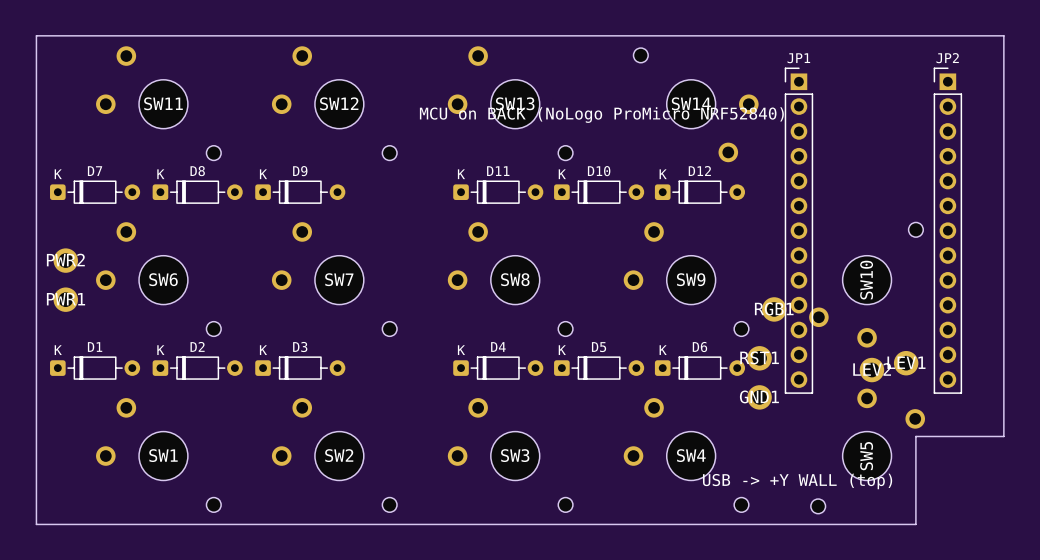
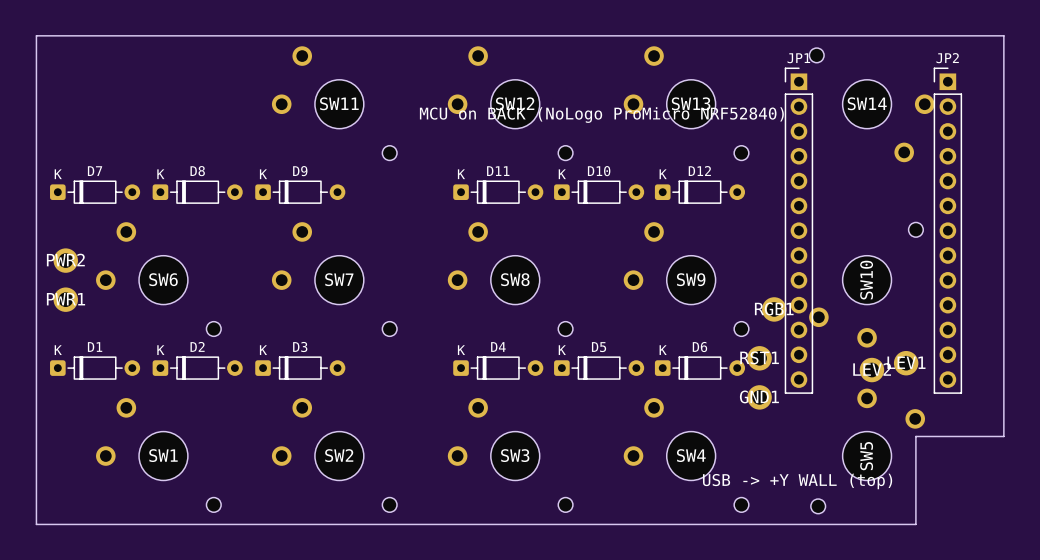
SW11: (158, 103) -> none
SW12 name: SW12 (339, 103) -> SW11 (339, 103)
SW13 name: SW13 (515, 103) -> SW12 (515, 103)
SW13: none -> (686, 103)
SW14 position: (696, 105) -> (871, 105)

